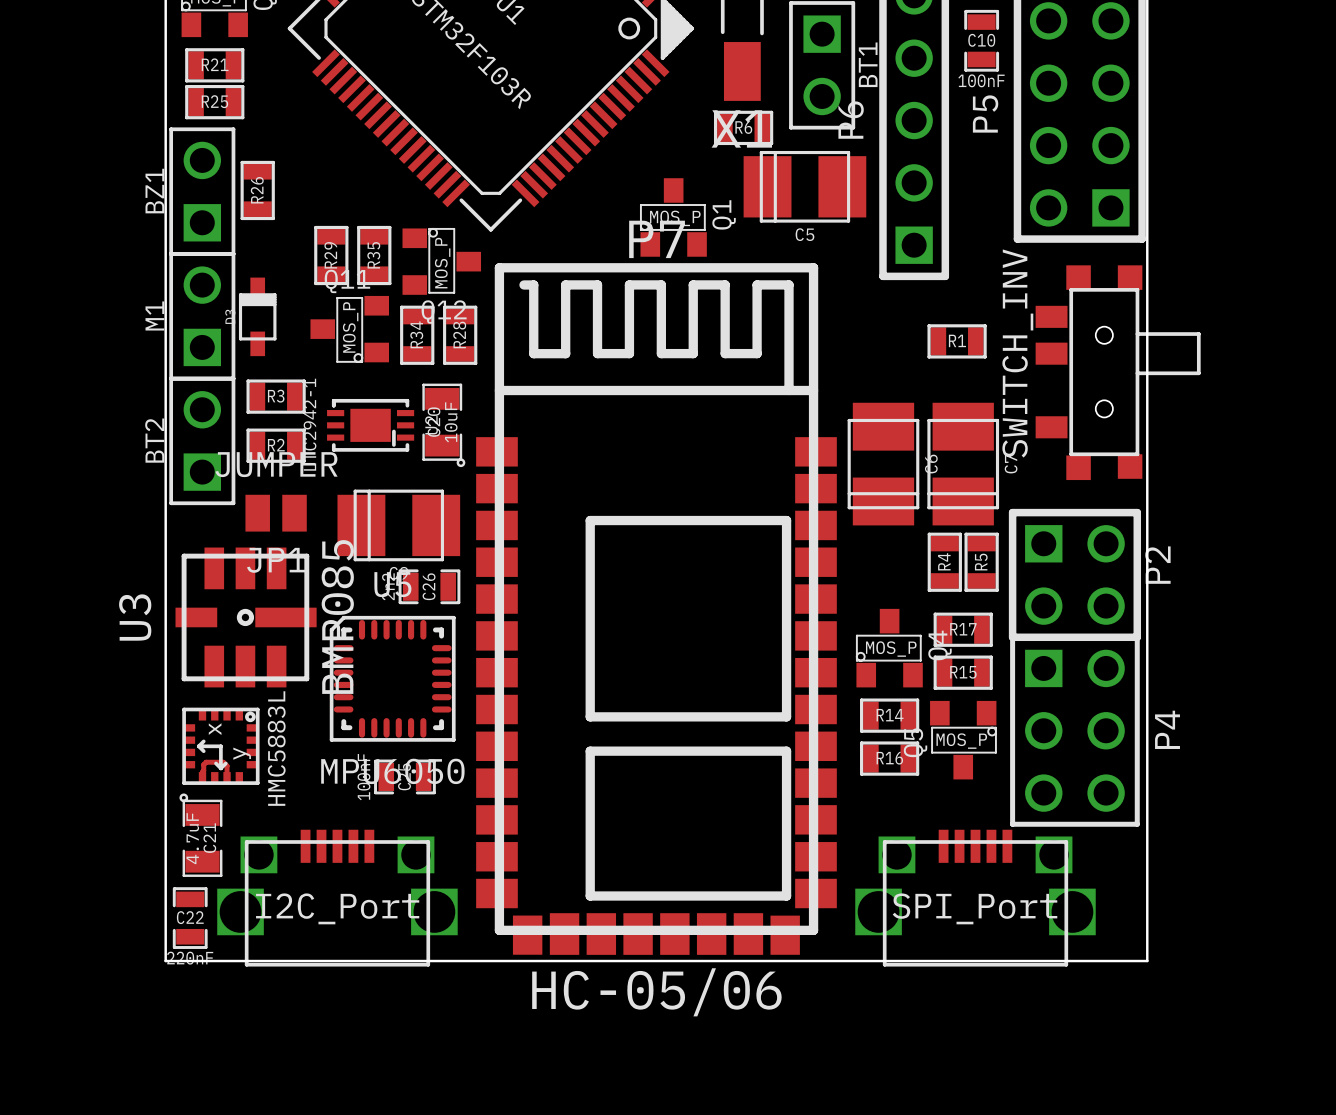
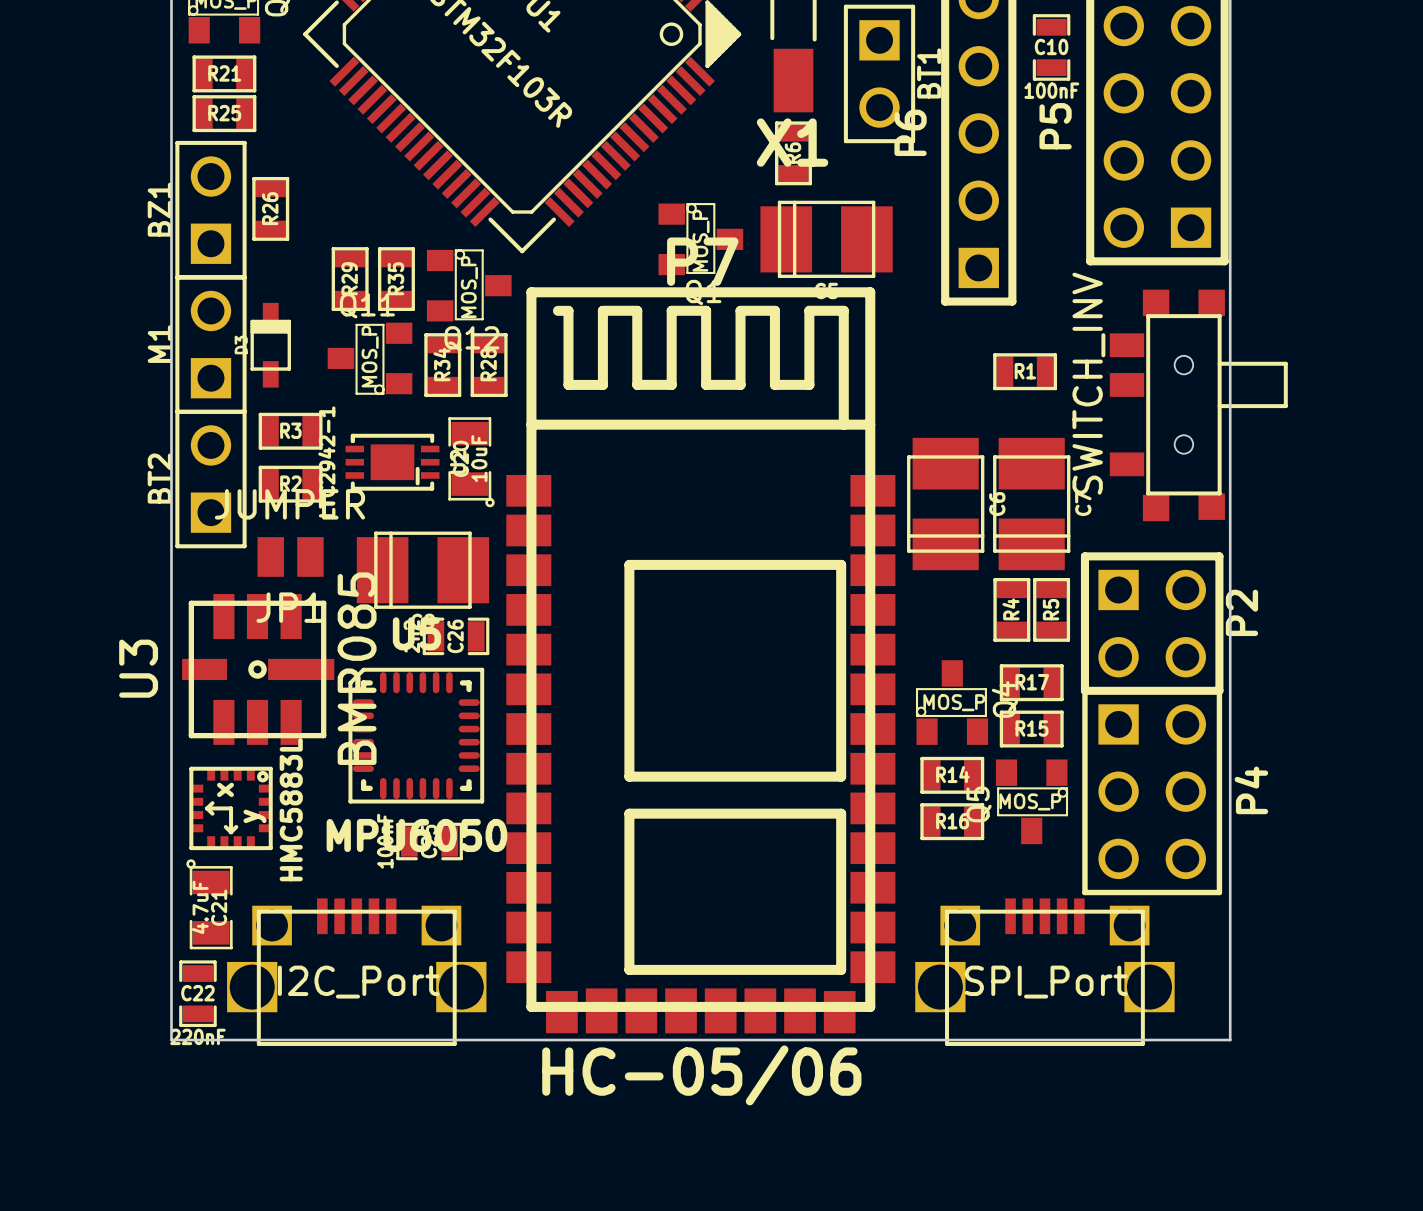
R6 rotation: 0° (743, 127) -> 90° clockwise (793, 153)
C5 position: (804, 186) -> (826, 239)
Q1 rotation: 0° (673, 217) -> 90° clockwise (700, 239)
top track: (202, 777) (203, 764) (206, 762) (223, 762) (227, 765) (227, 777) -> none

